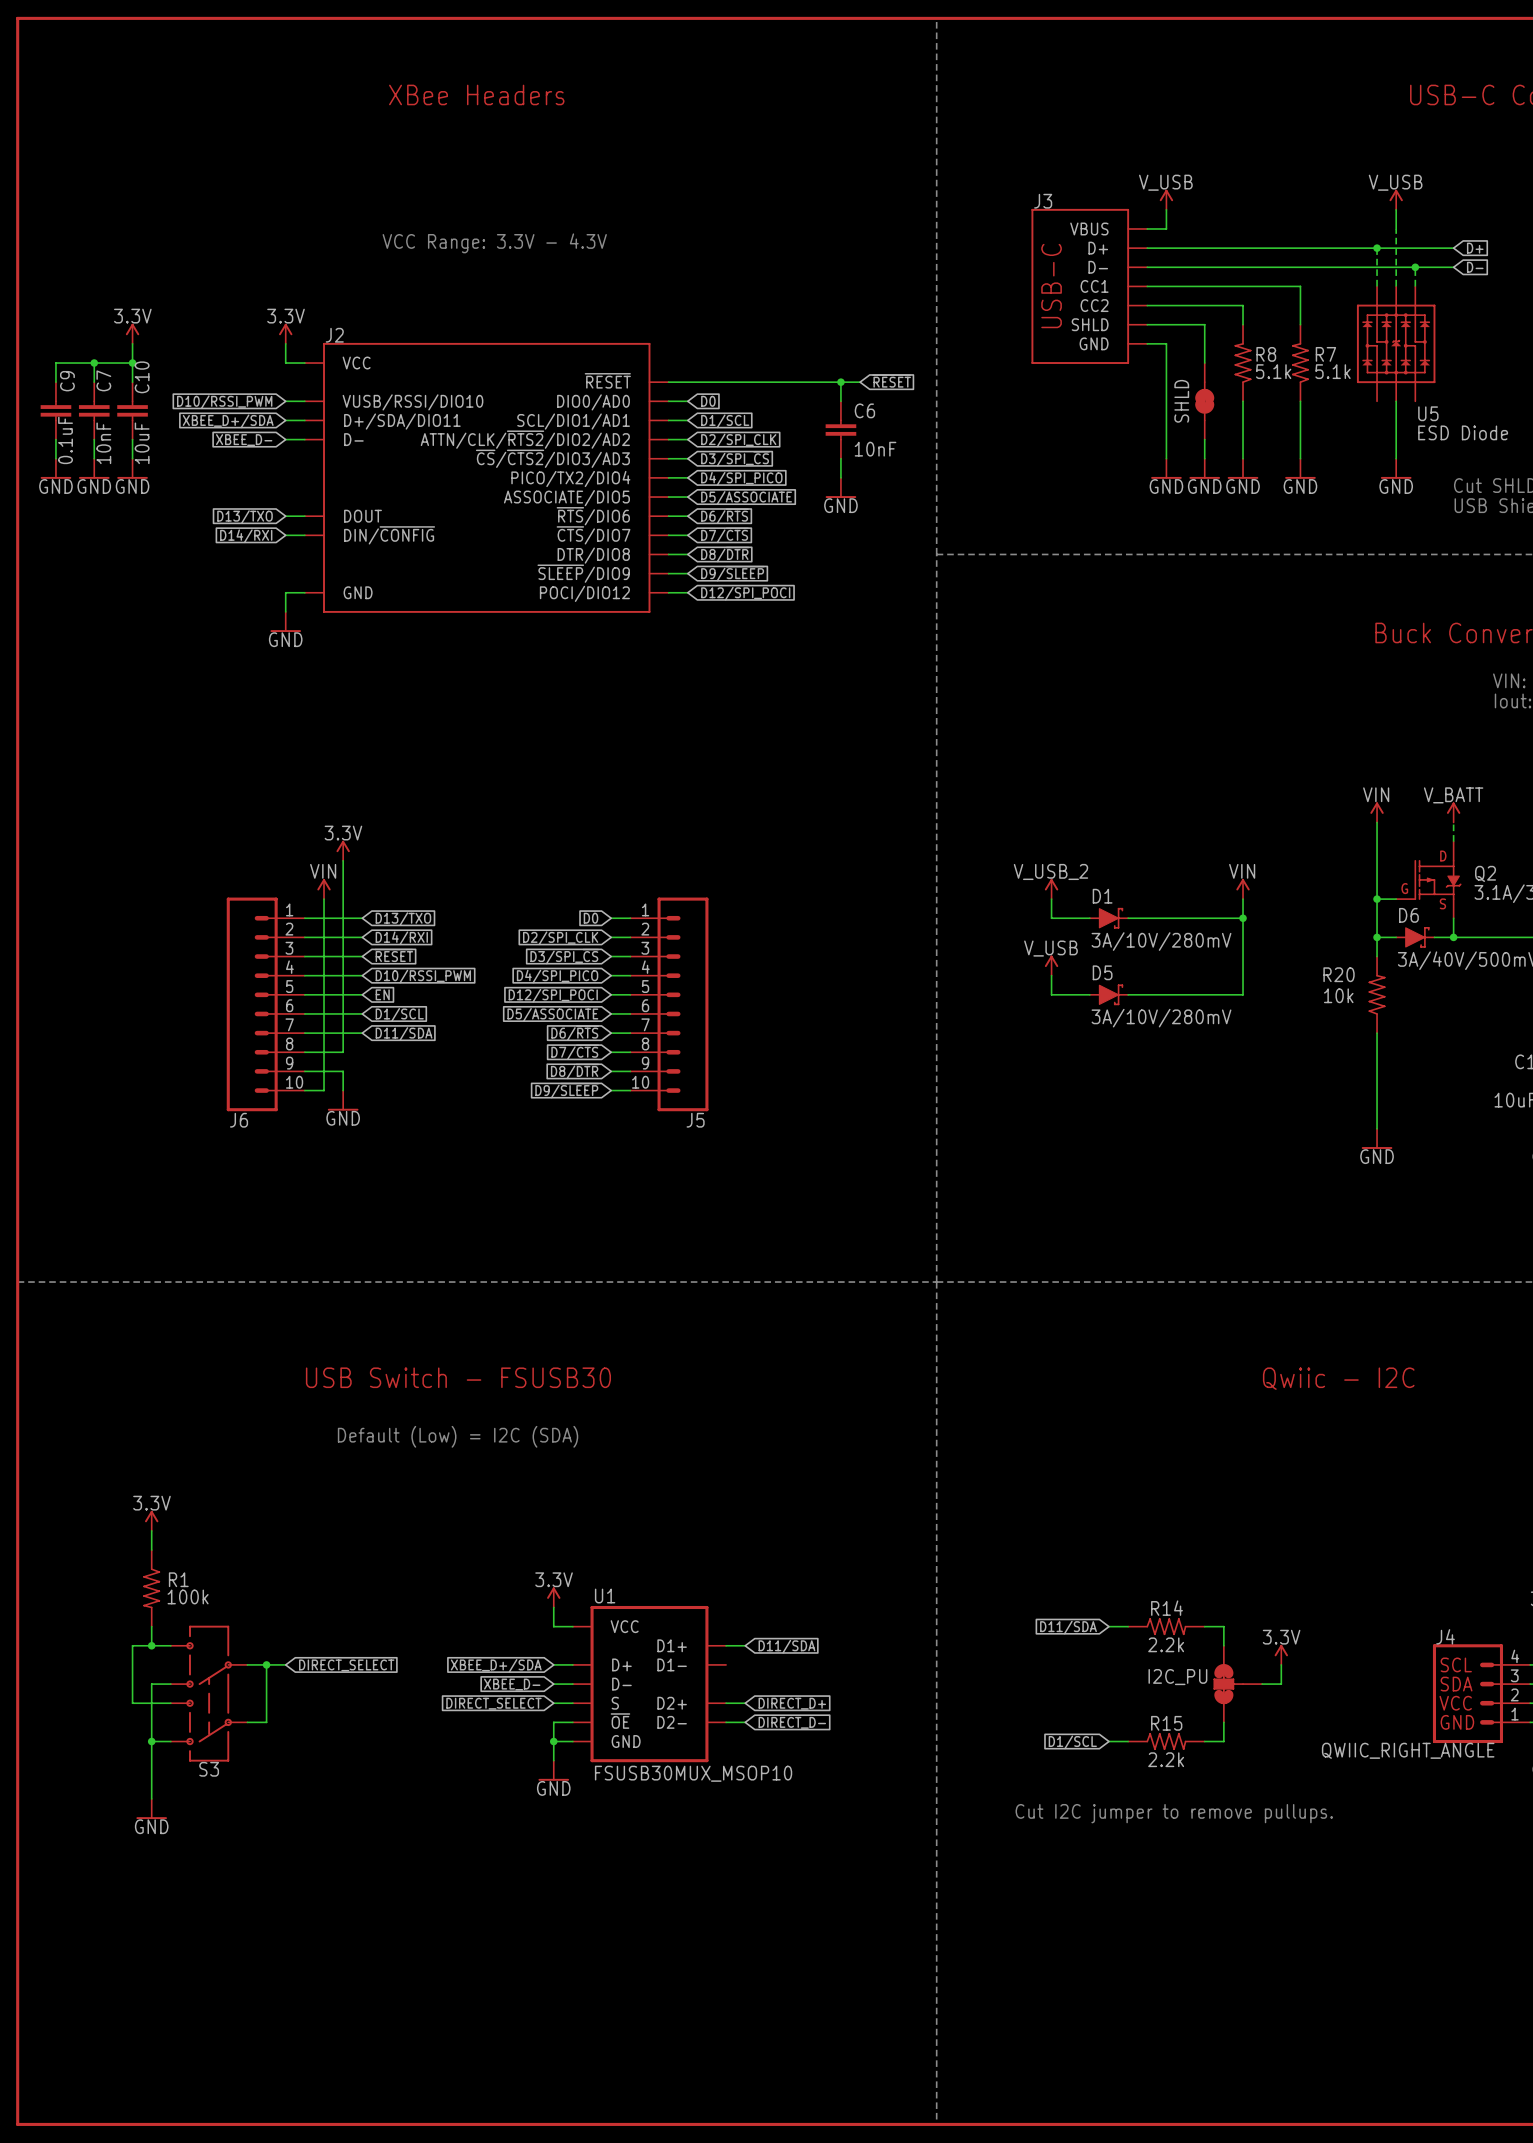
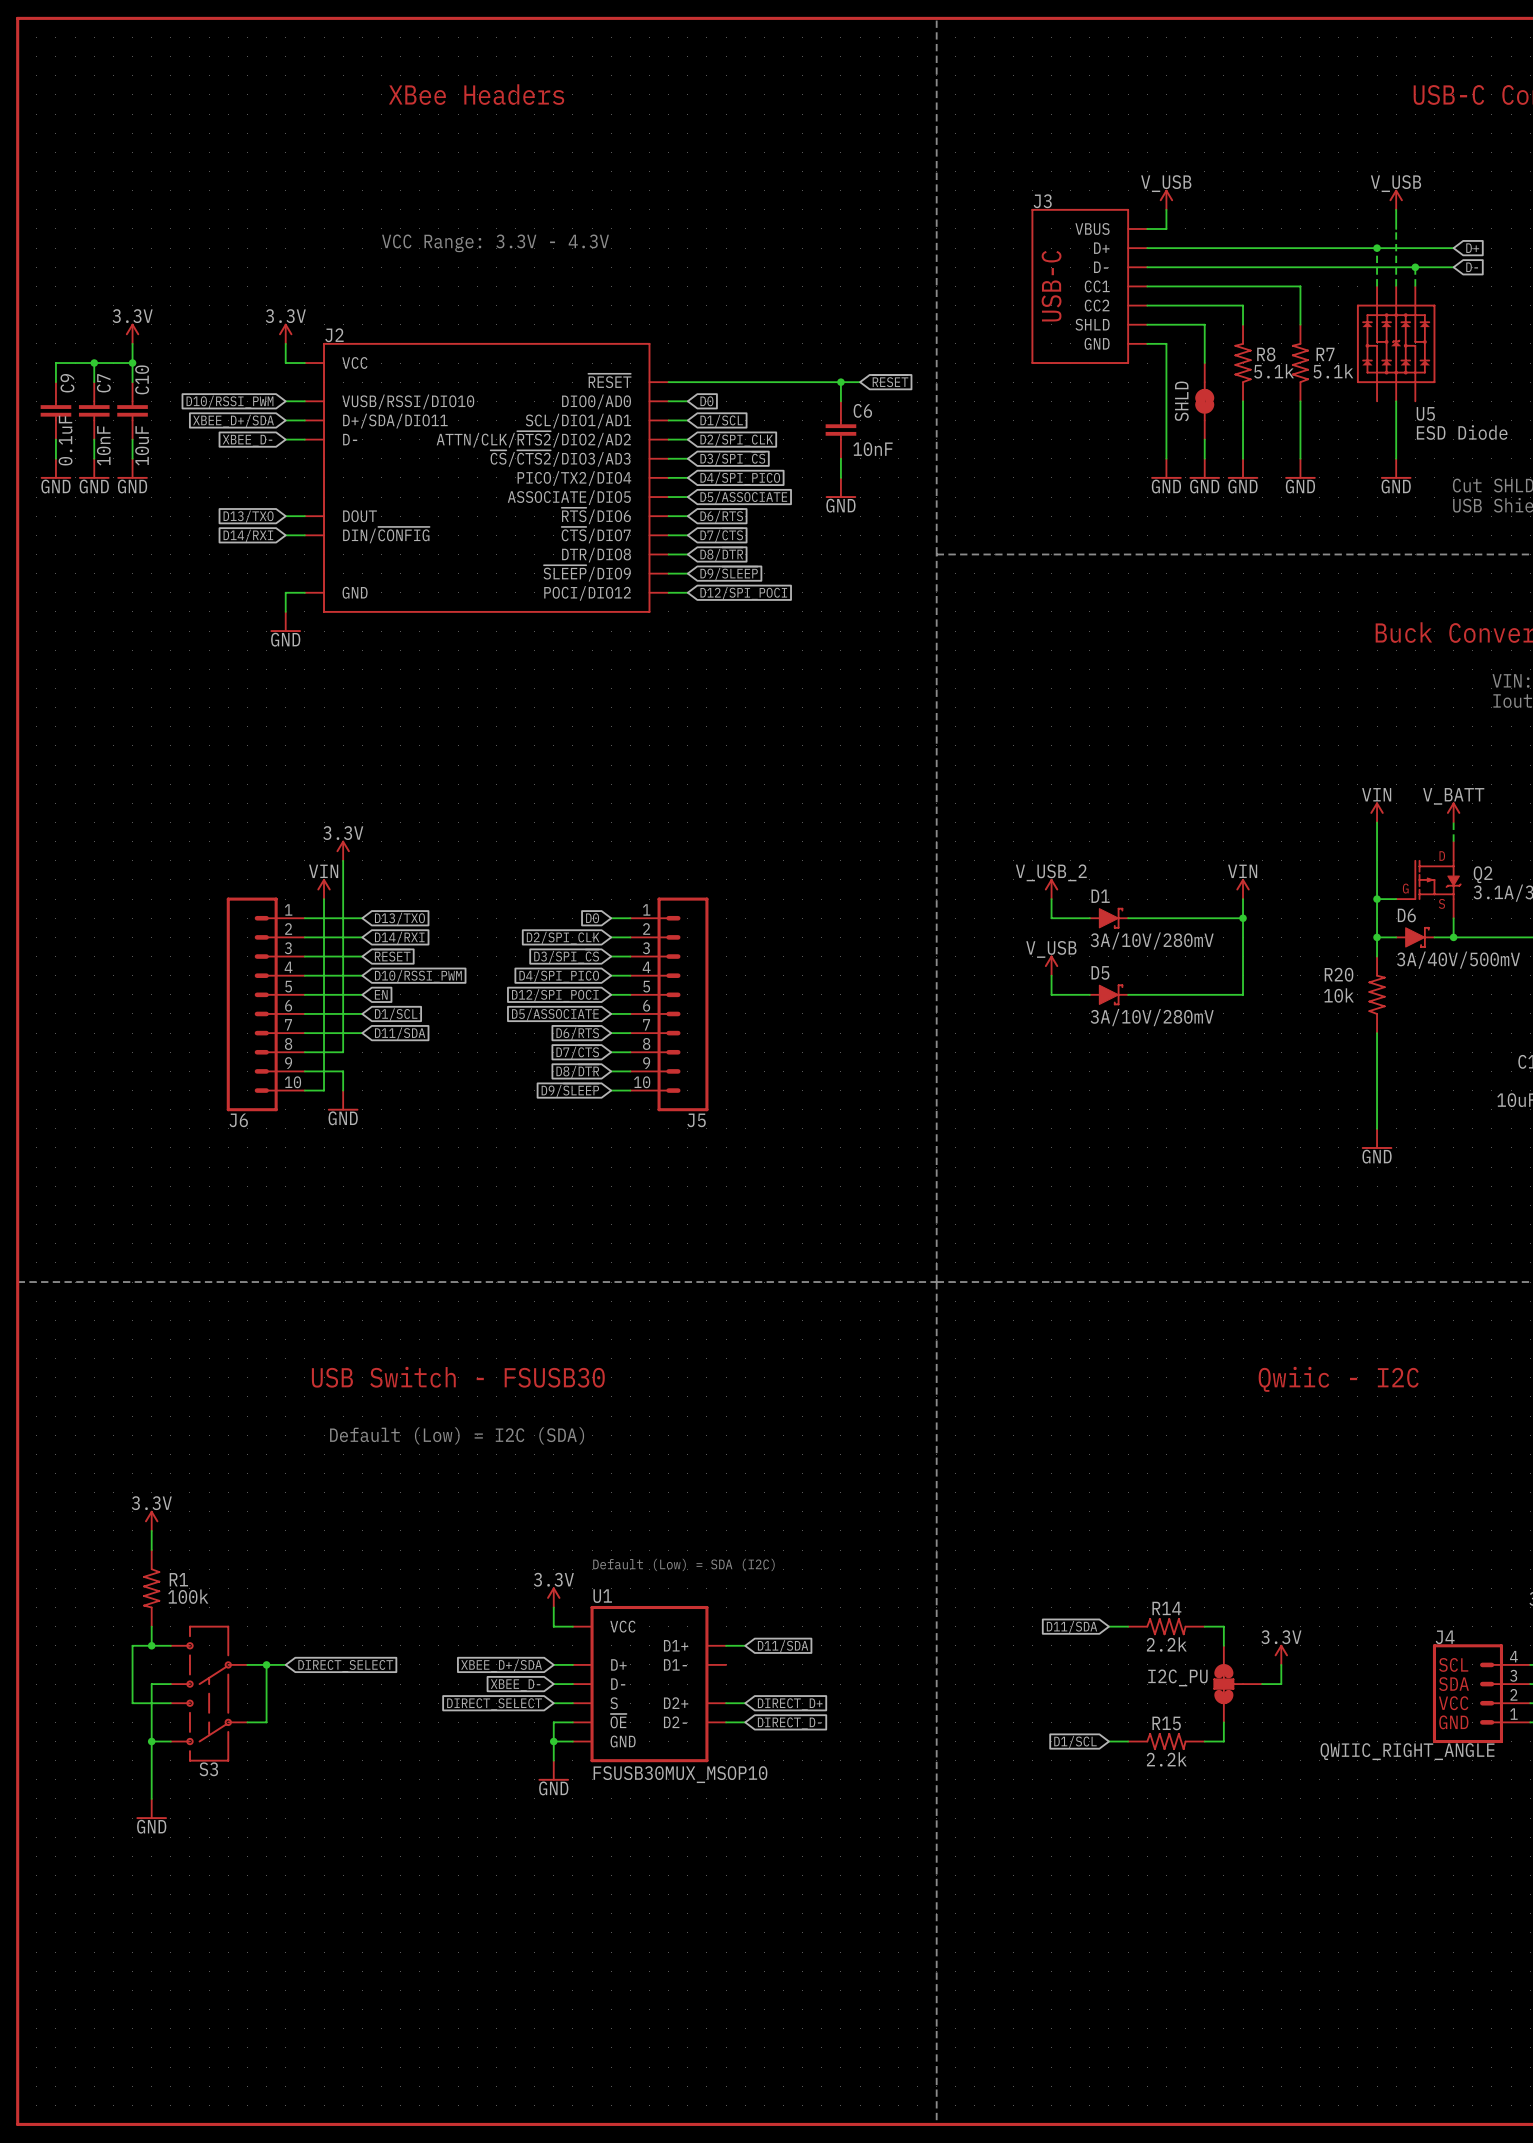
text: none -> Default (Low) = SDA (I2C) (683, 1564)
text: Cut I2C jumper to remove pullups. (1174, 1813) -> none

